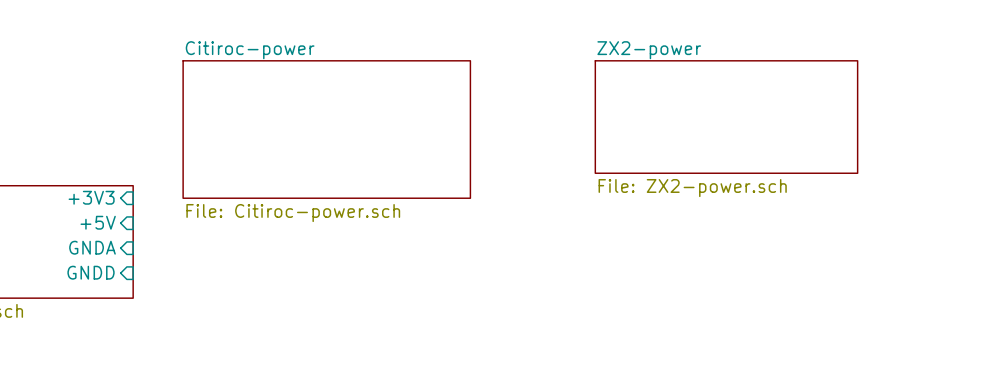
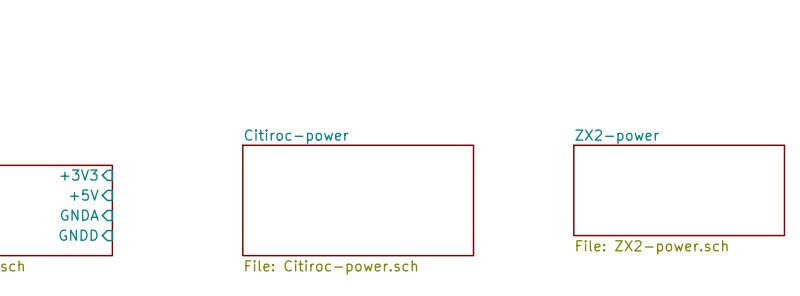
sheet ZX2-power position: (726, 117) -> (679, 190)
sheet Citiroc-power position: (326, 129) -> (358, 200)

